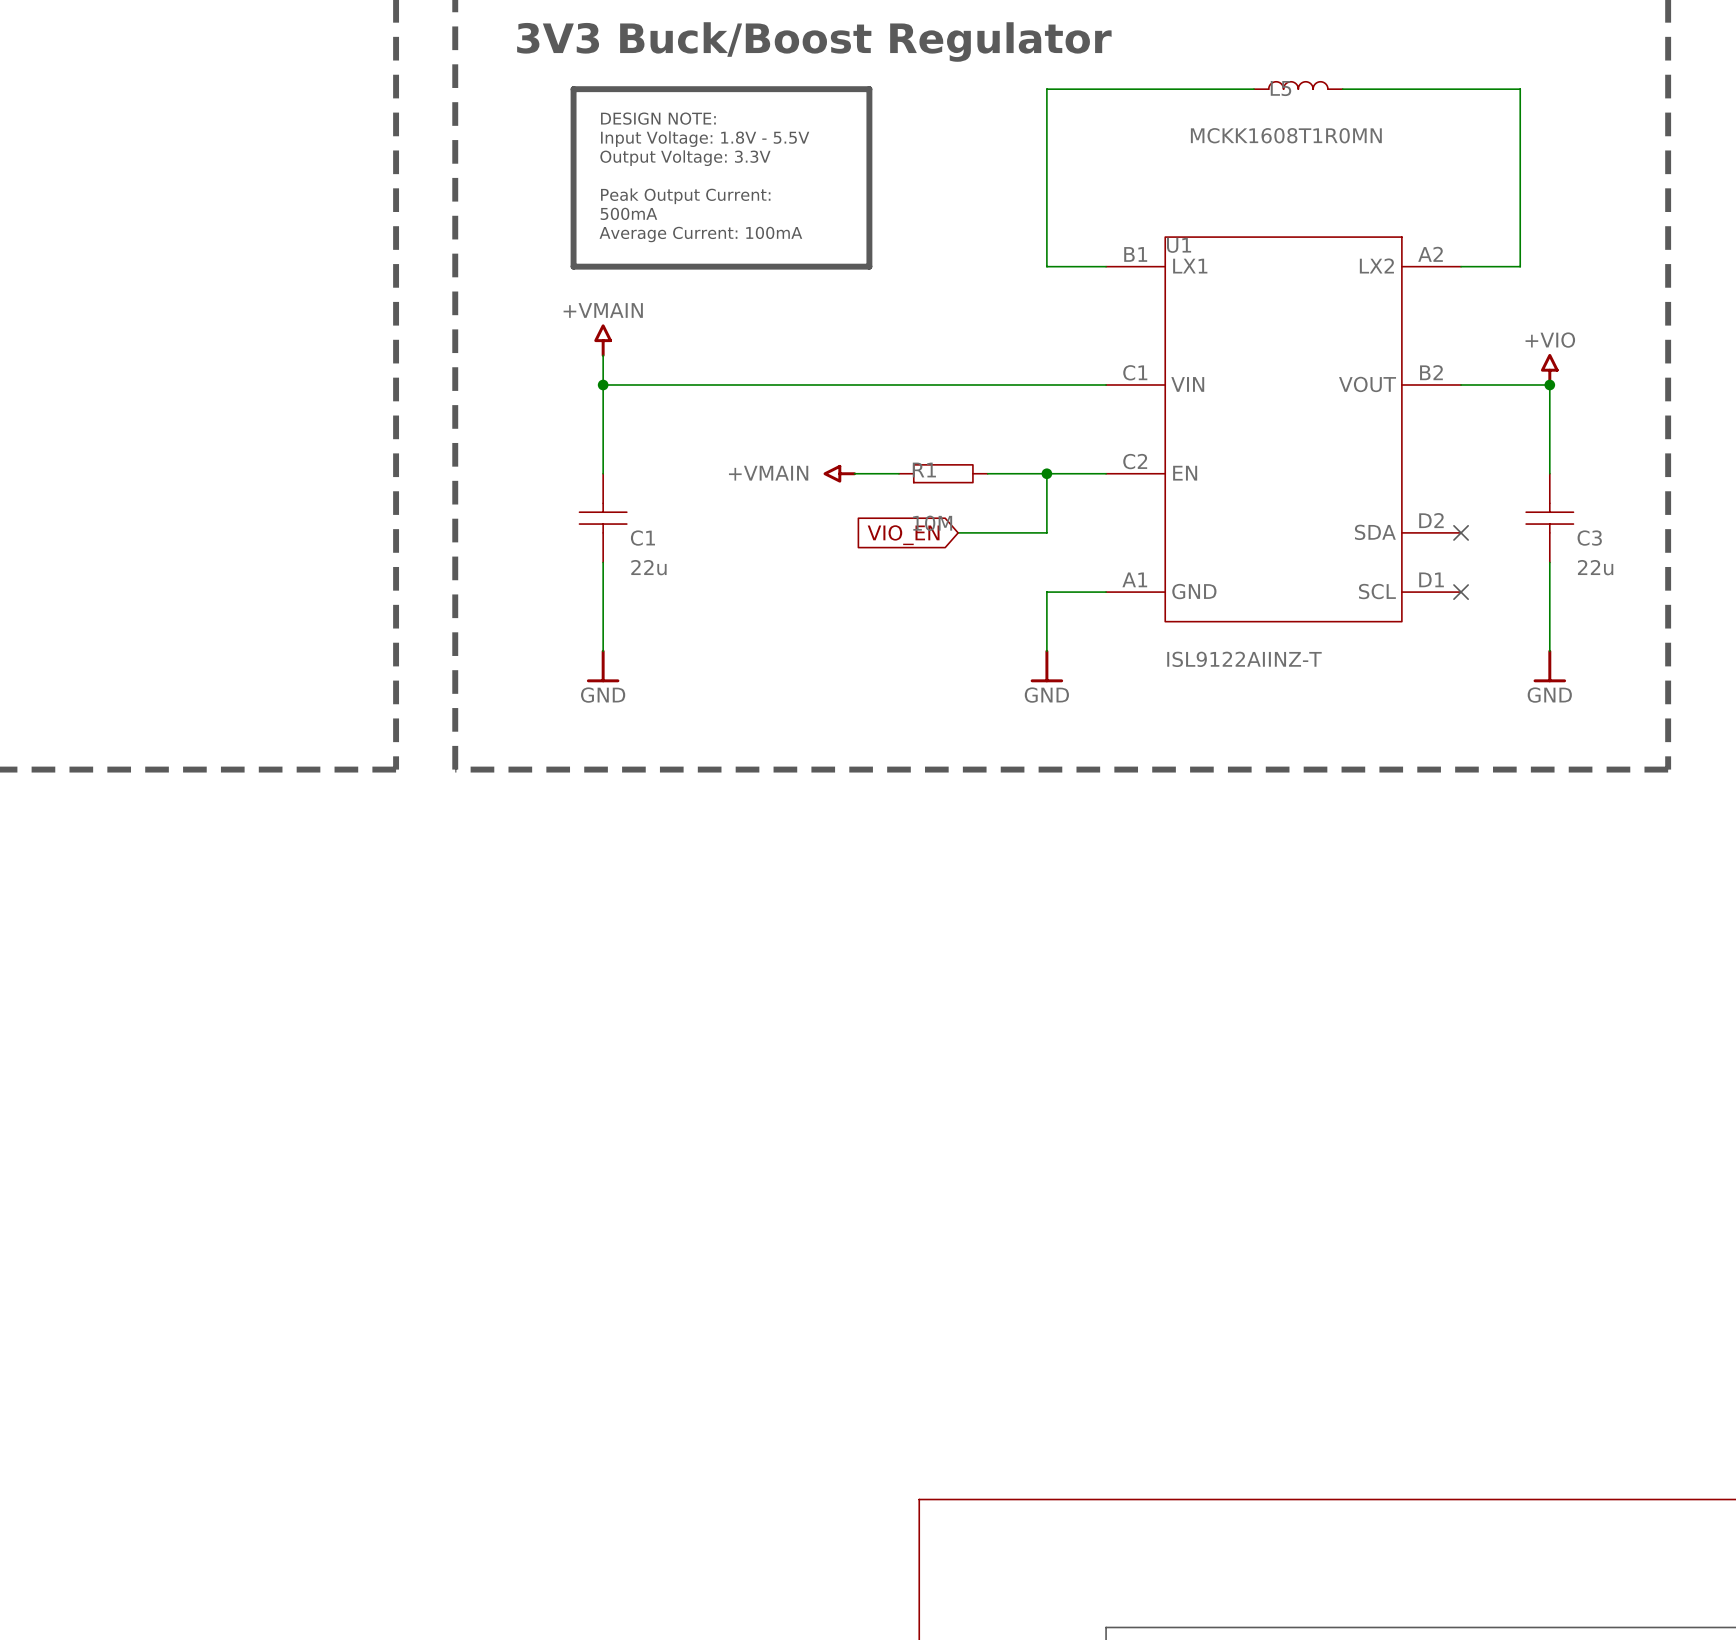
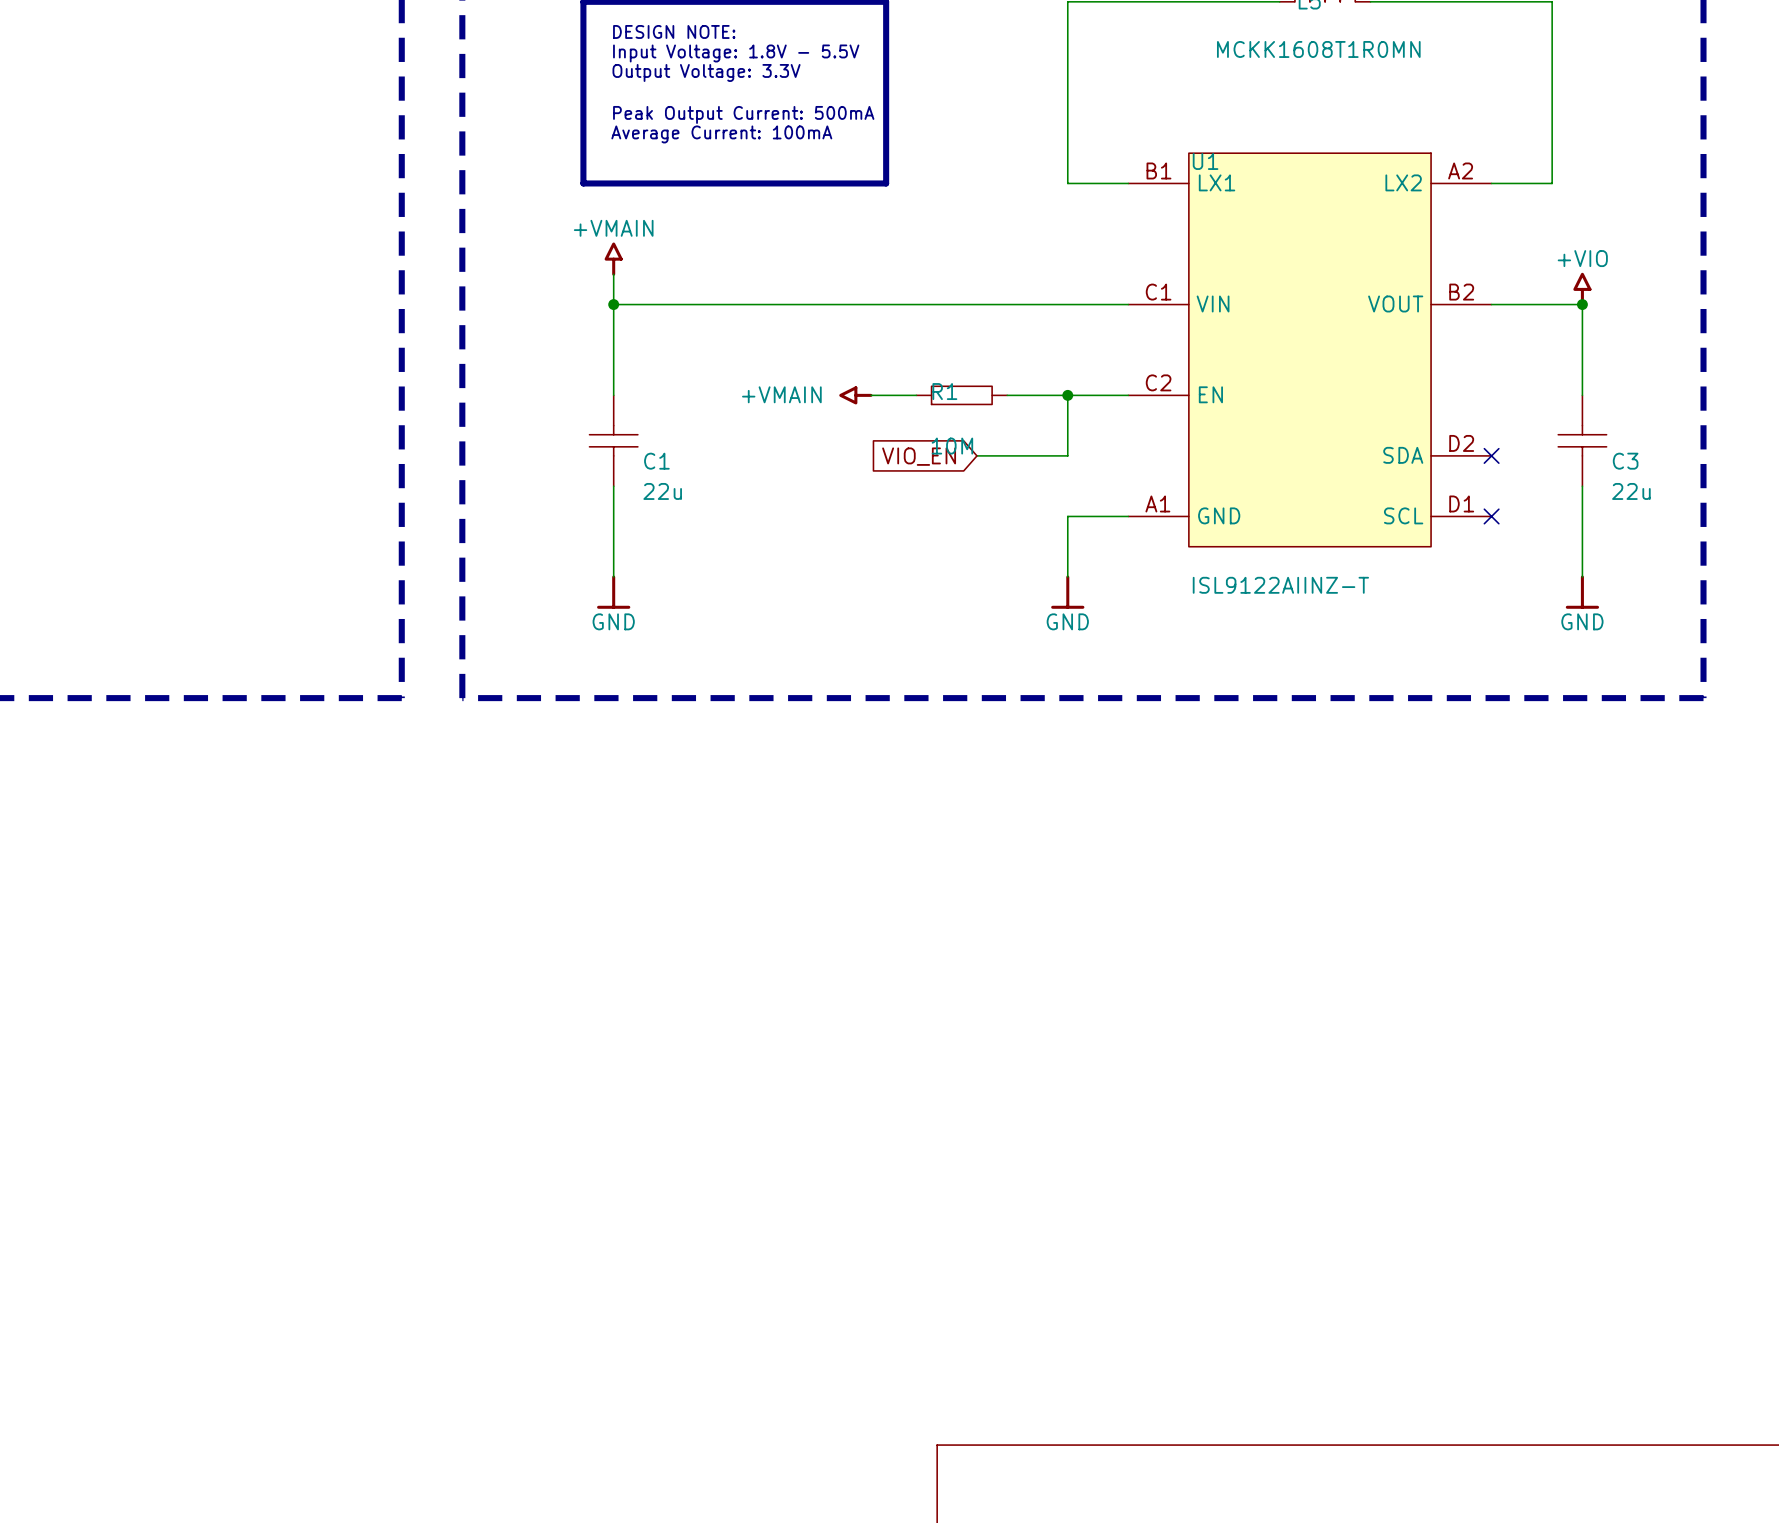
text: Peak Output Current: (685, 196) -> Peak Output Current: 500mA (743, 114)
text: 500mA (628, 213) -> Average Current: 100mA (721, 134)
text: Average Current: 100mA (700, 234) -> none

